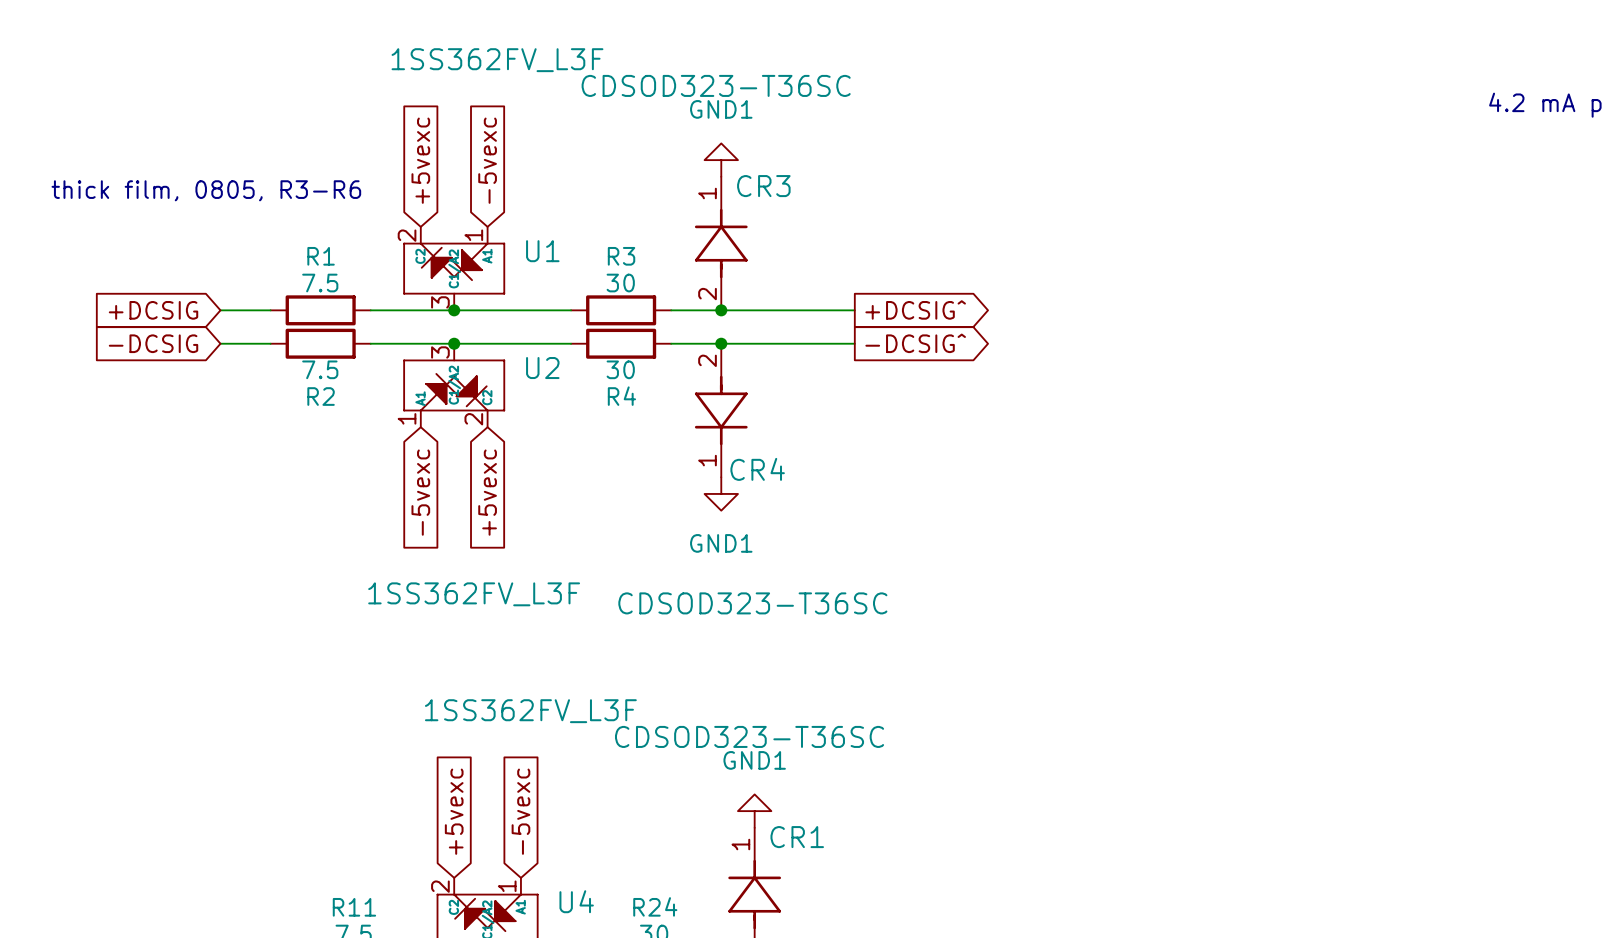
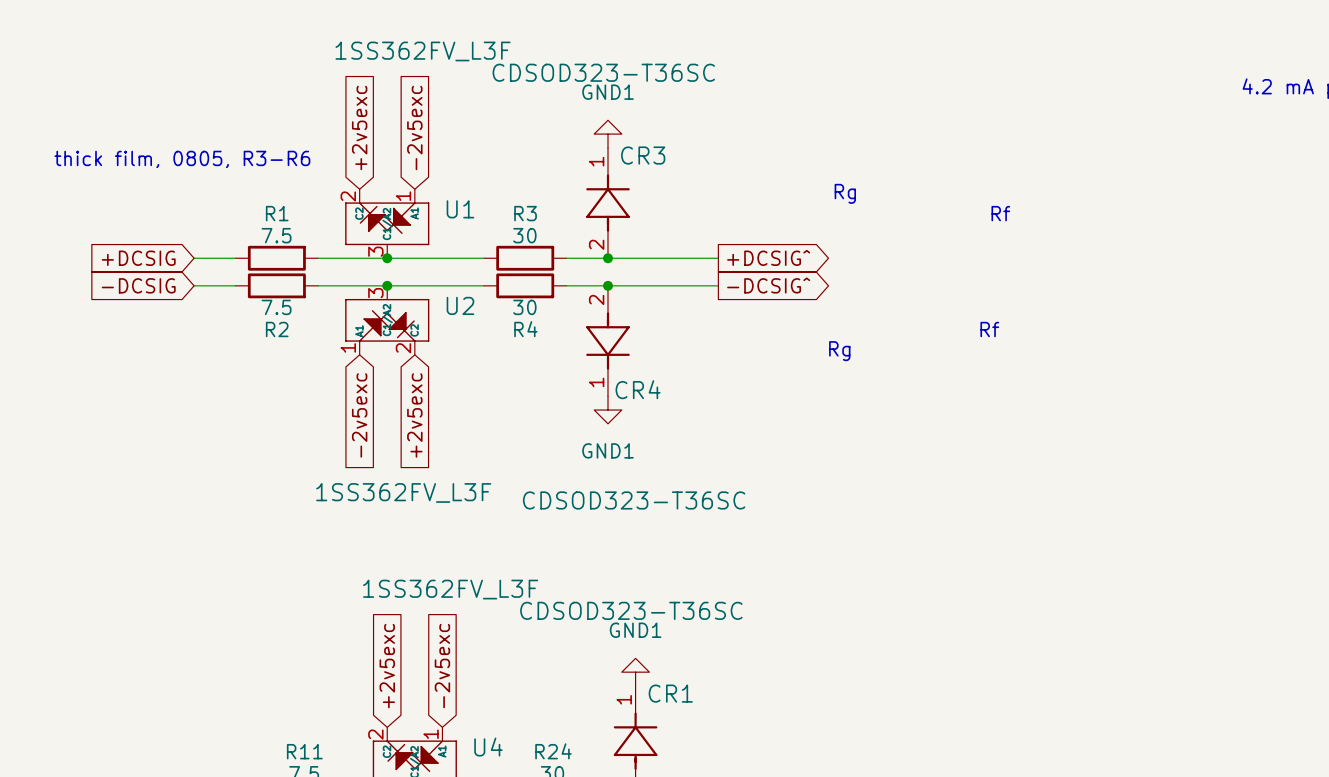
global label: +5vexc (420, 160) -> +2v5exc (359, 127)
global label: -5vexc (487, 160) -> -2v5exc (414, 127)
text: none -> Rg (845, 193)
text: none -> Rf (1000, 213)
text: none -> Rf (989, 329)
text: none -> Rg (839, 351)
global label: -5vexc (420, 492) -> -2v5exc (359, 415)
global label: +5vexc (487, 492) -> +2v5exc (414, 415)
global label: +5vexc (454, 811) -> +2v5exc (387, 666)
global label: -5vexc (520, 811) -> -2v5exc (442, 666)

